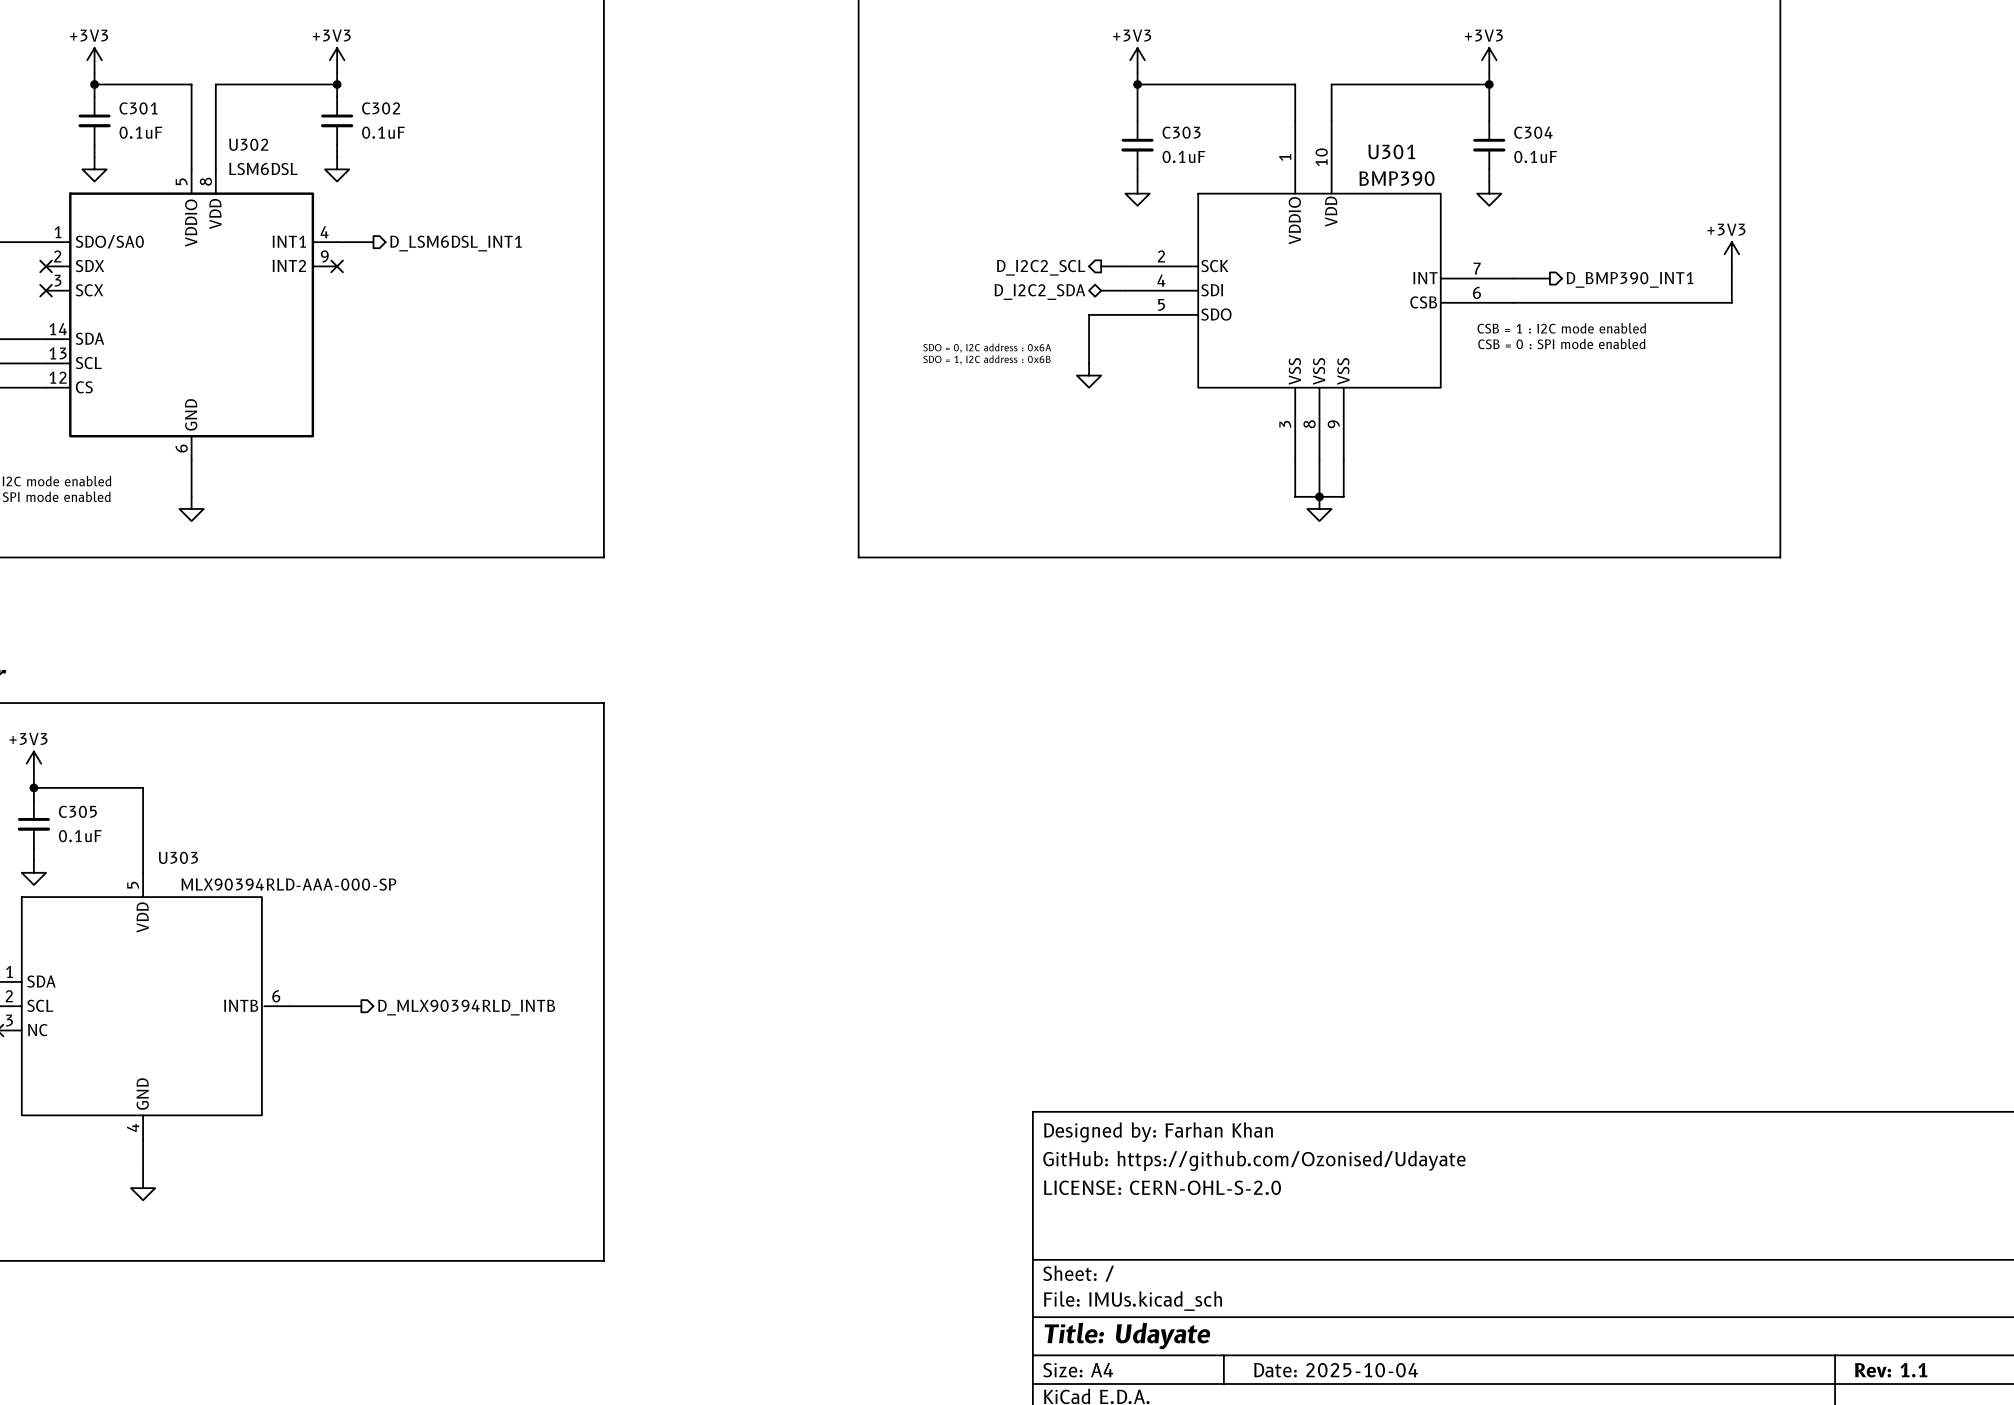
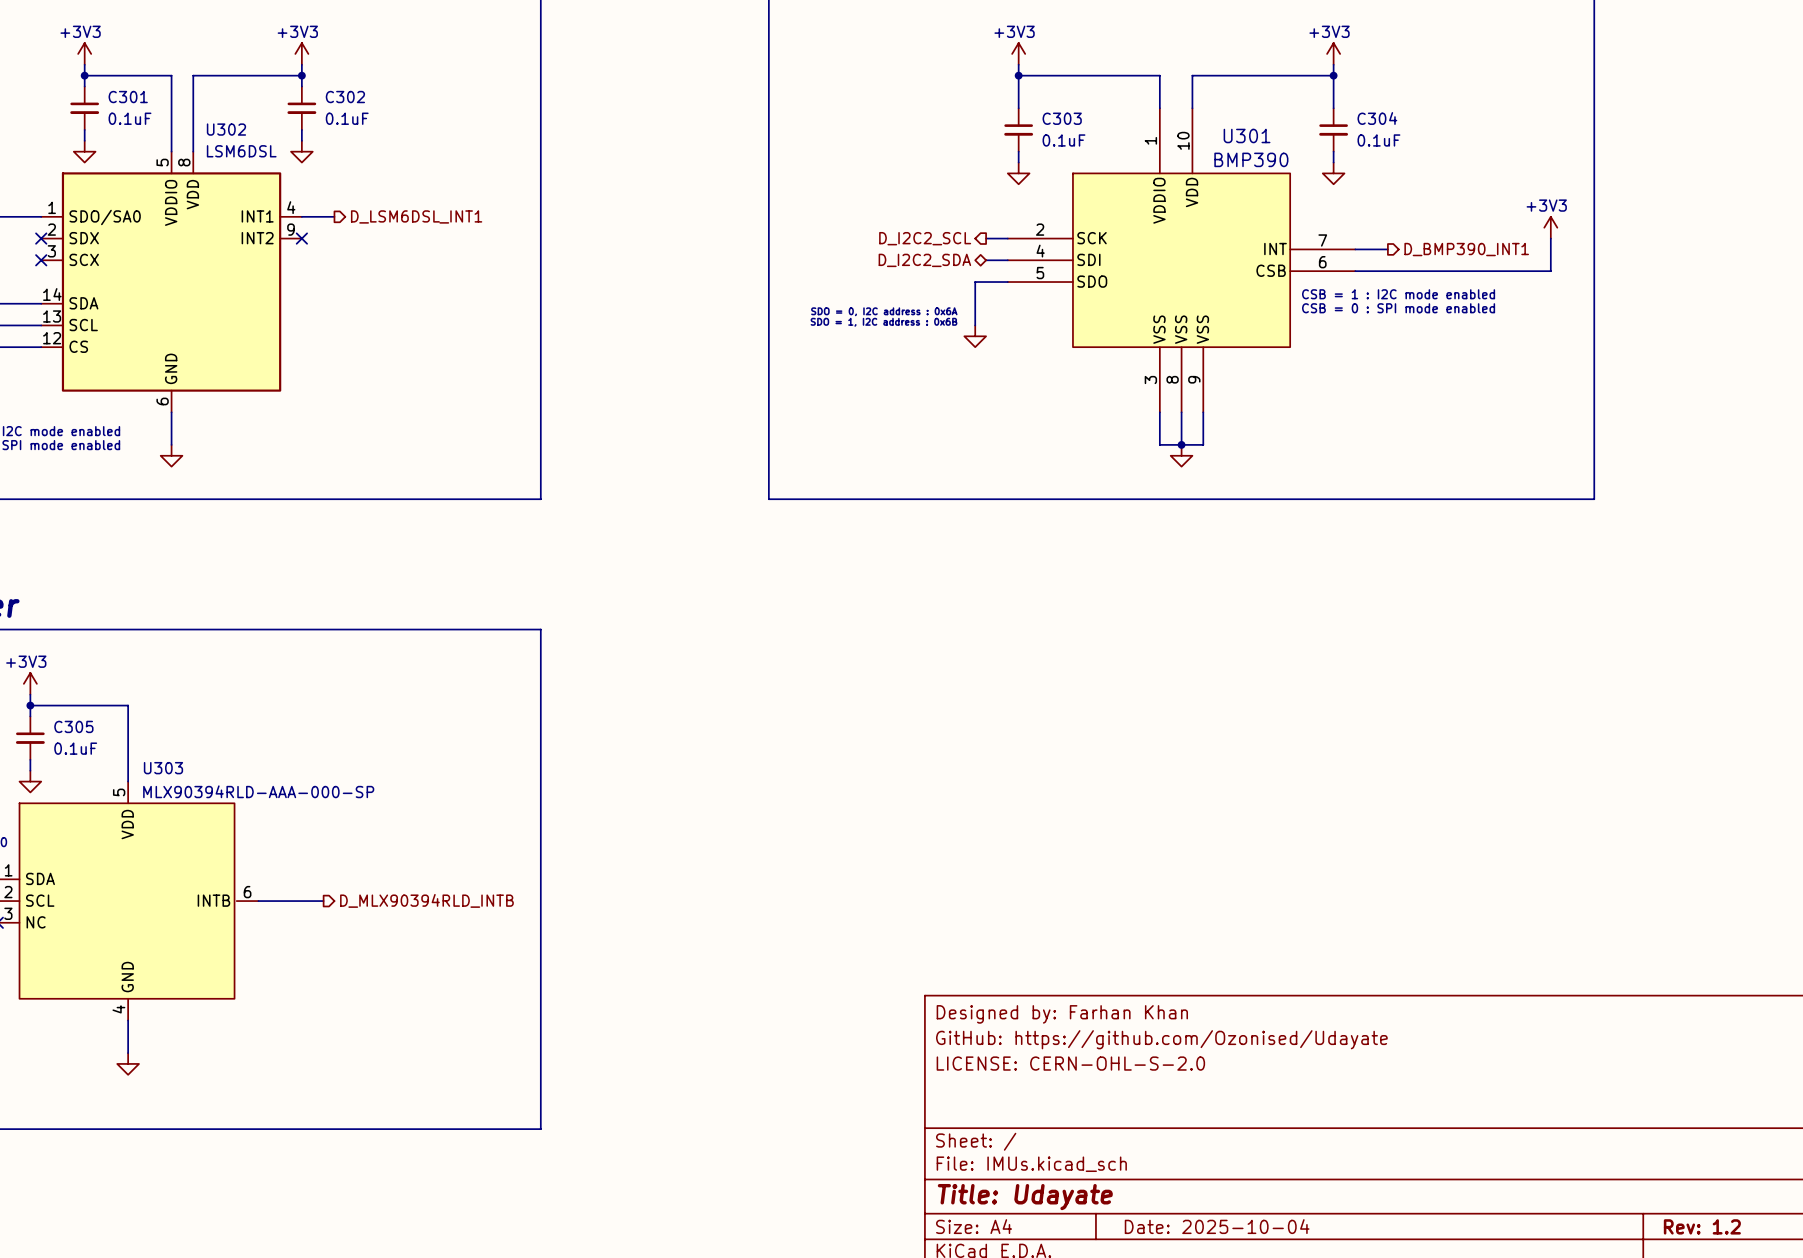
title block: Rev: 1.1 (1891, 1370) -> Rev: 1.2 (1702, 1226)

